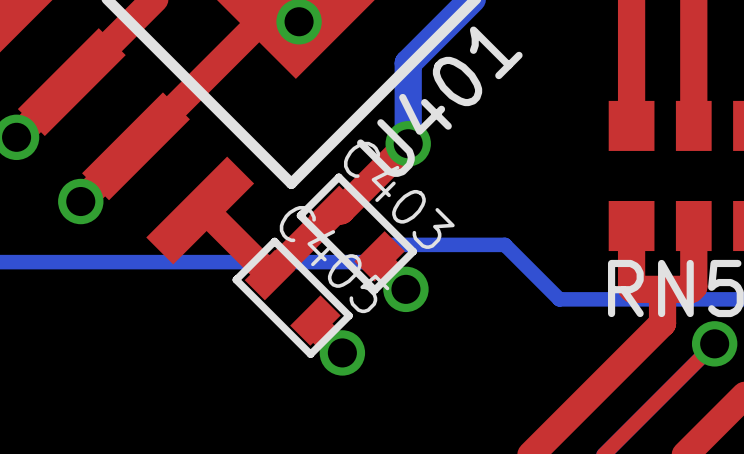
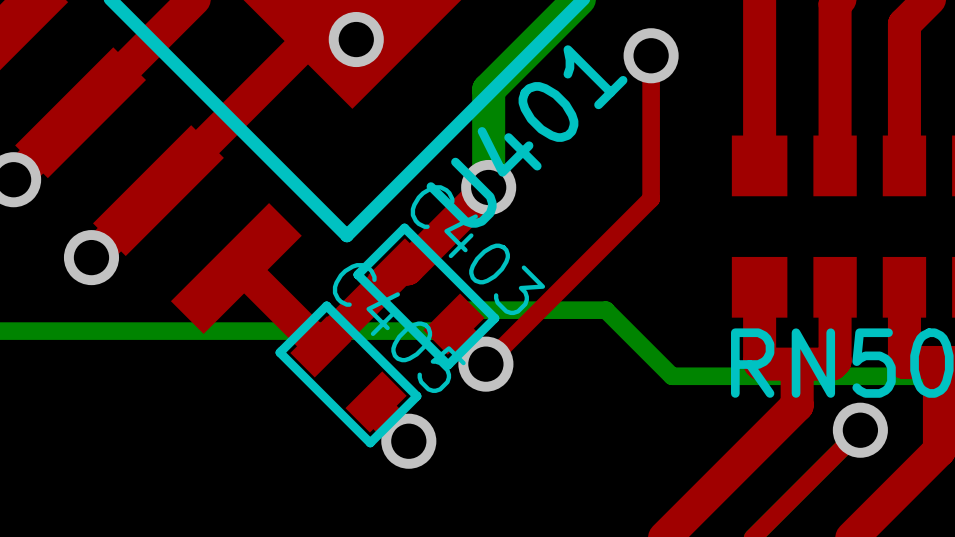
top track: none -> (651, 55) (651, 198) (485, 364)
via: none -> (651, 55)

